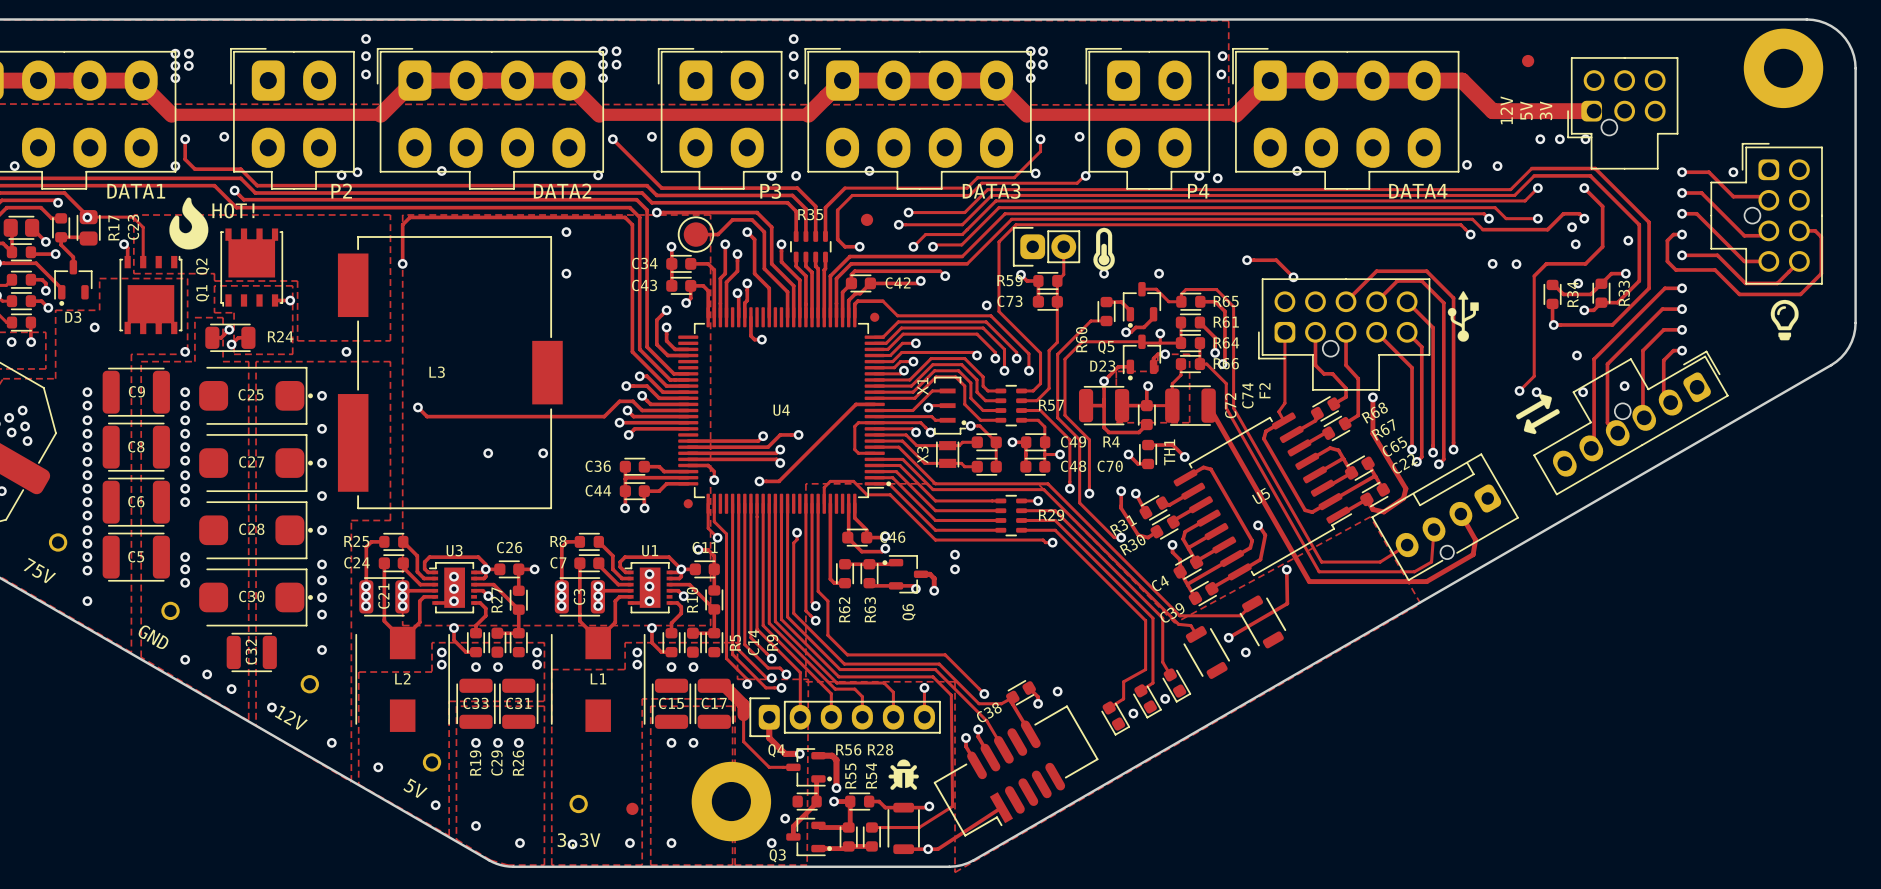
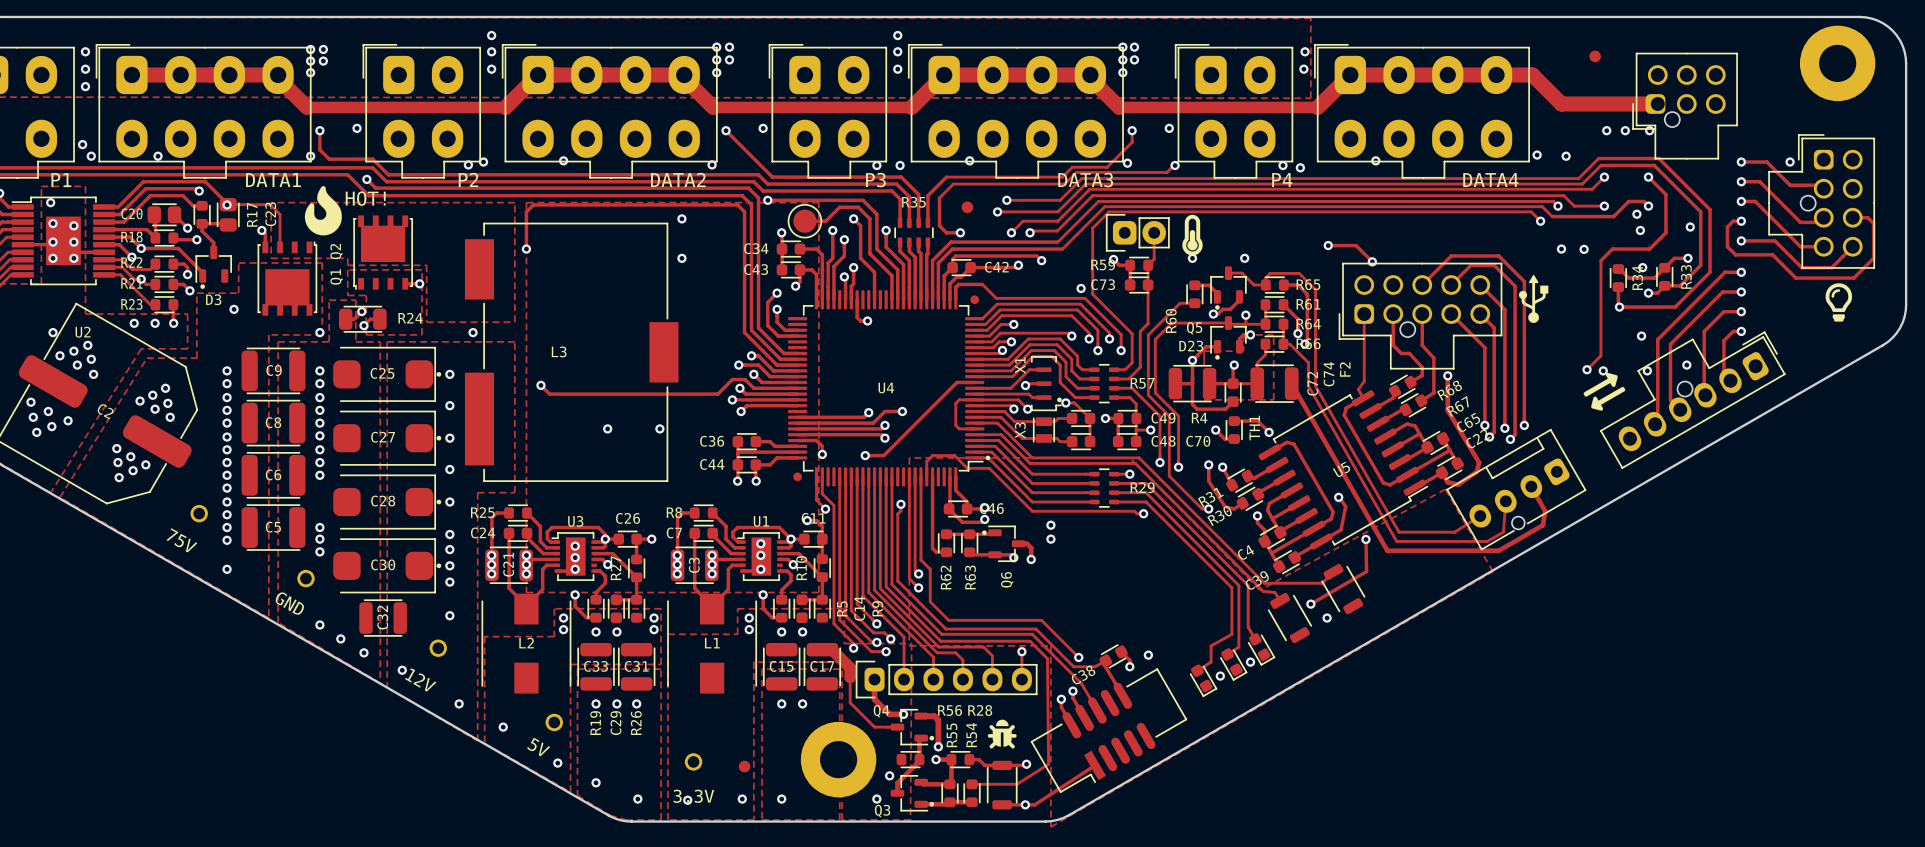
text: 12V (1506, 110) -> none
text: 5V (1526, 110) -> none
text: 3V (1546, 110) -> none

